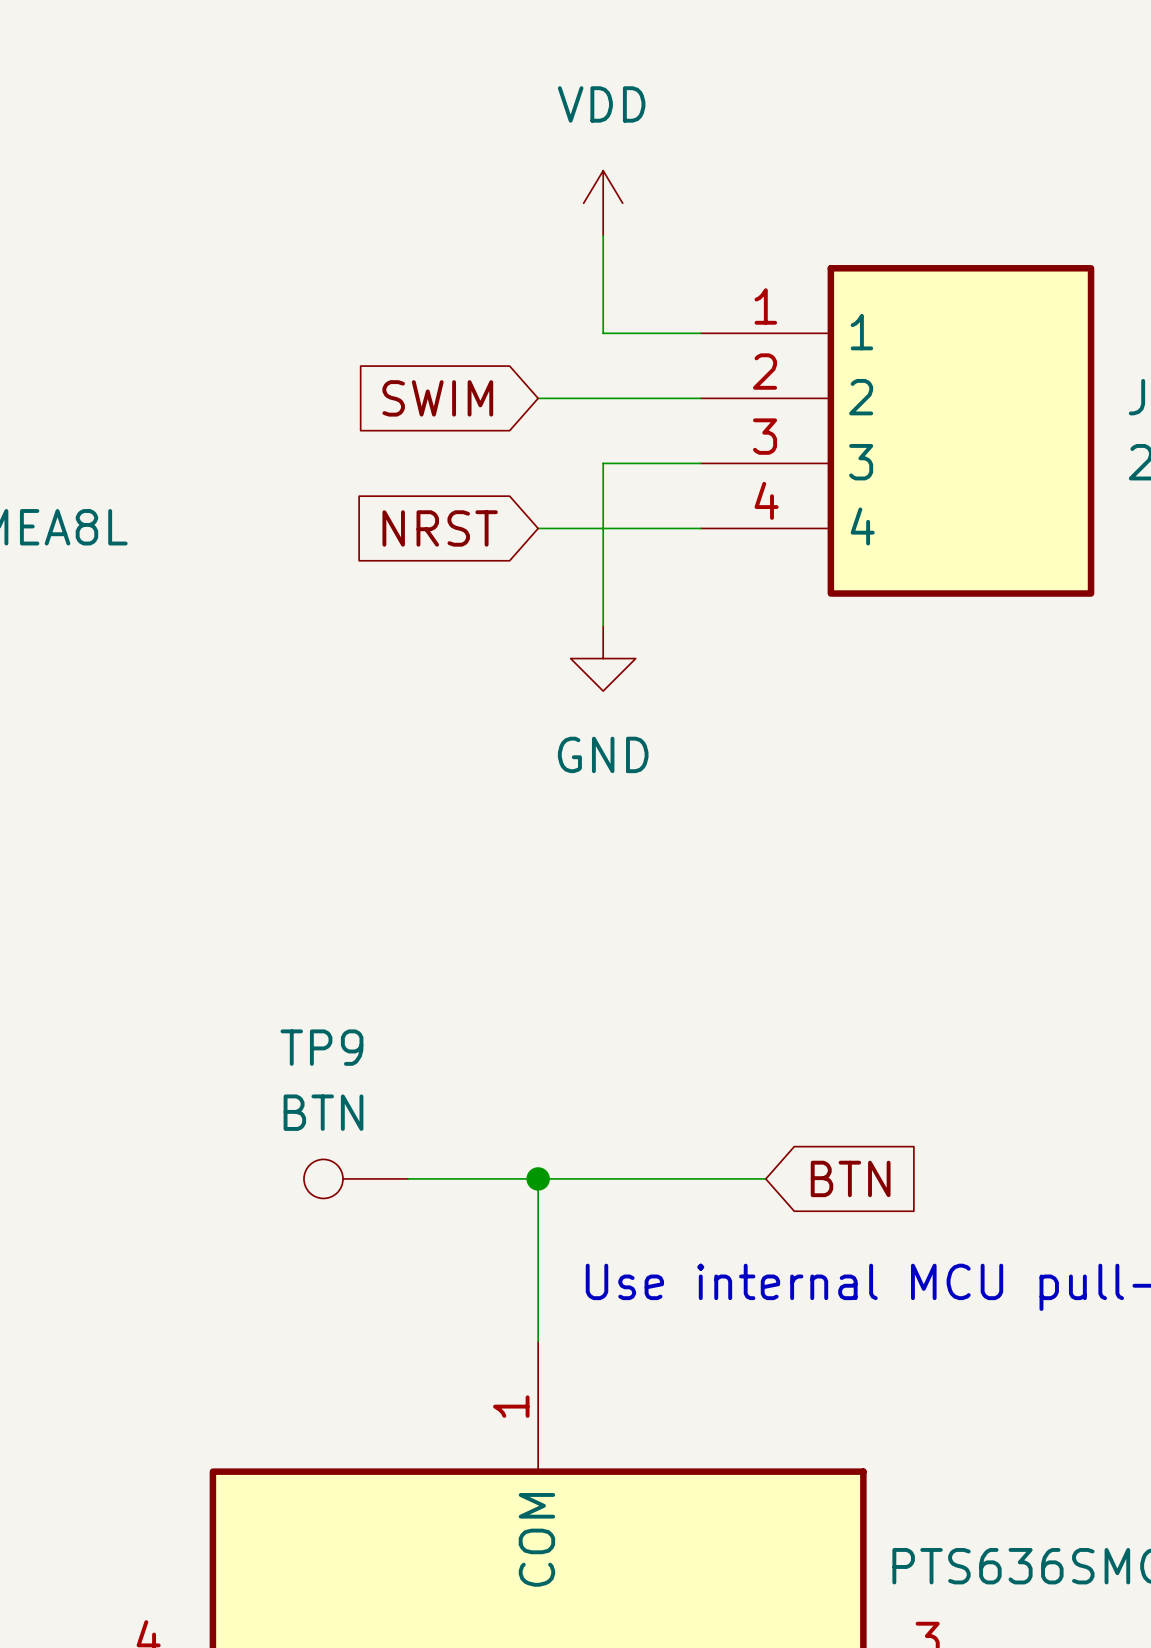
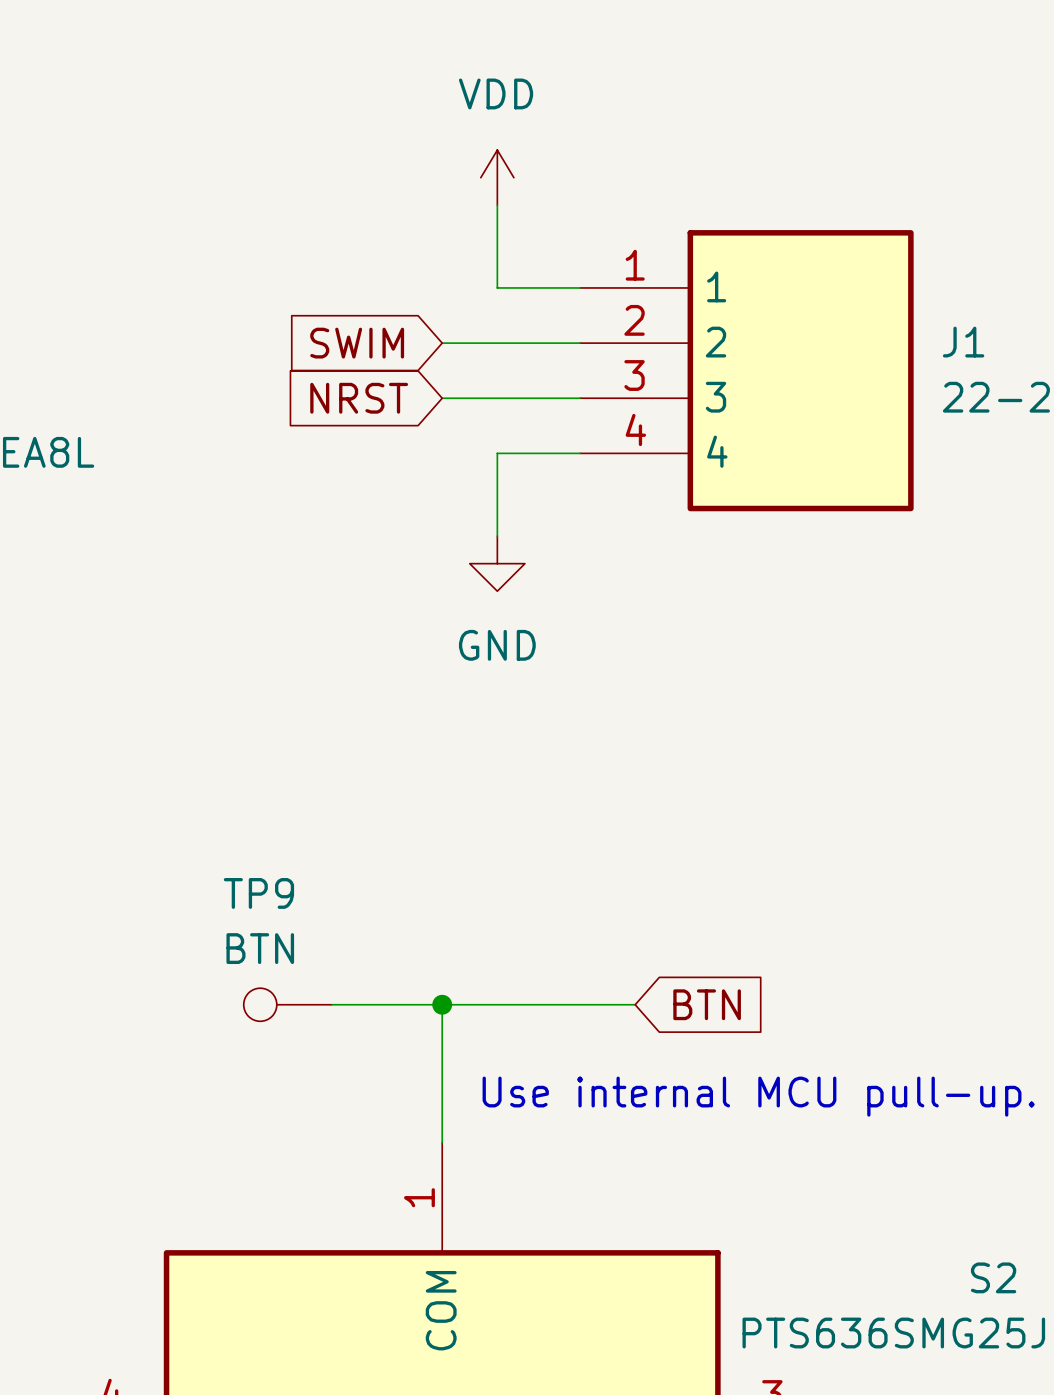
wire: (603, 463) (603, 528) (538, 528) -> (497, 398) (442, 398)
global label position: NRST (440, 528) -> NRST (359, 398)

